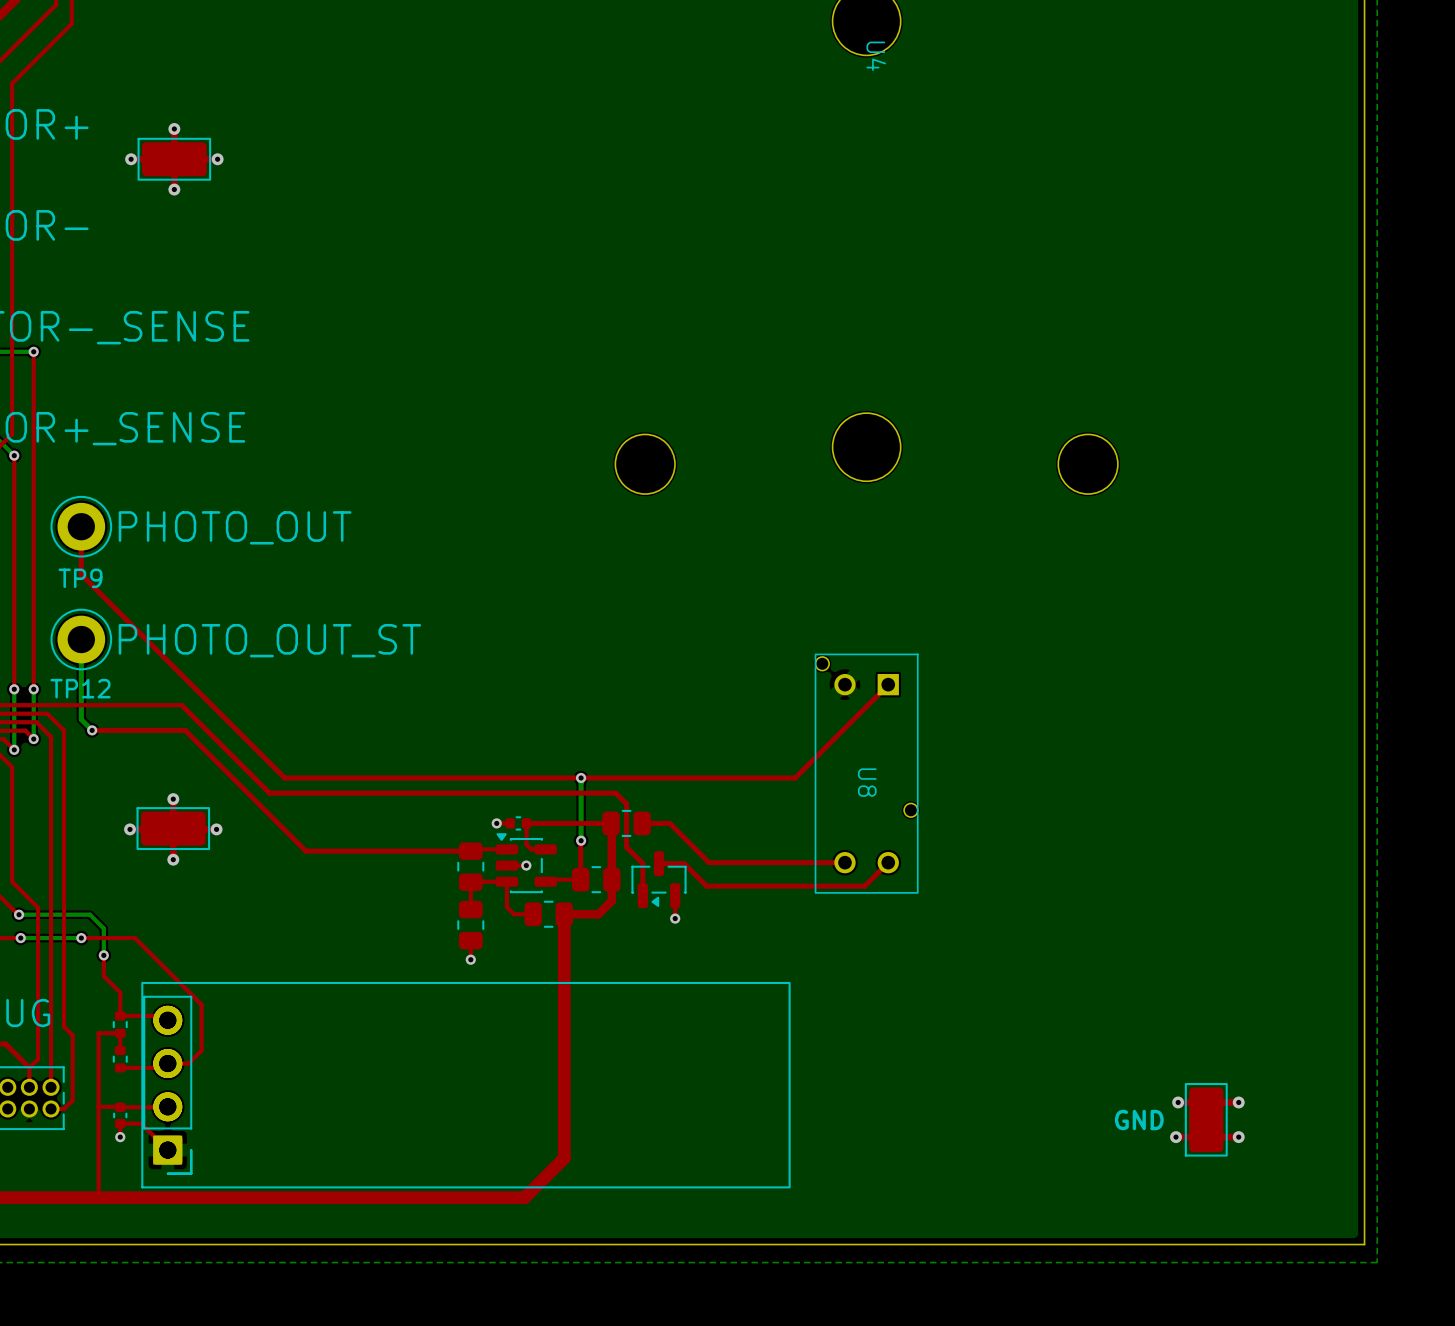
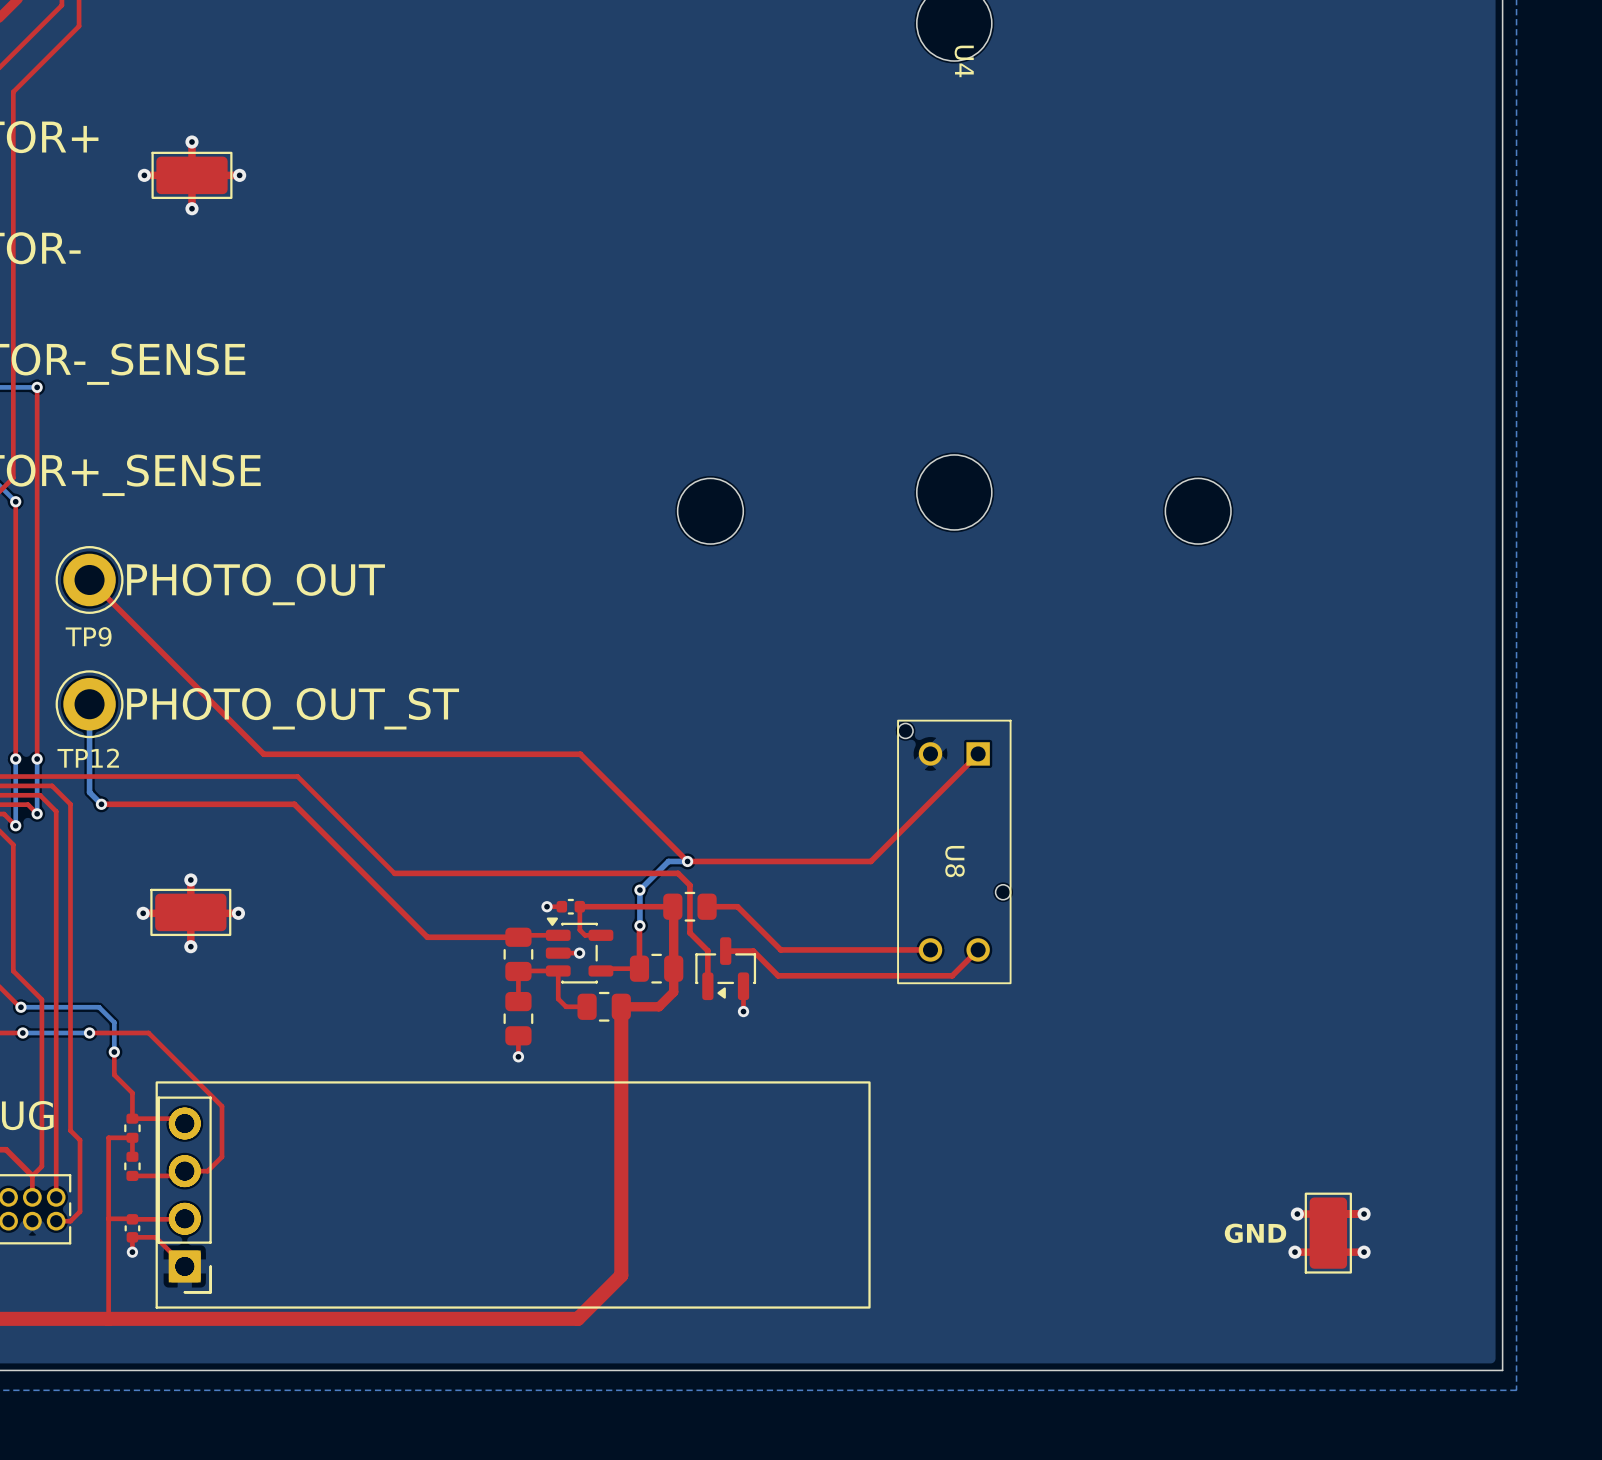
top track: (81, 526) (81, 574) (284, 777) (795, 777) -> (89, 579) (263, 754) (580, 754) (687, 861) (870, 861) (875, 856)
top track: (181, 705) (269, 793) (358, 793) -> (199, 776) (297, 776) (394, 873)
top track: (185, 730) (305, 851) (388, 851) -> (203, 804) (294, 804) (427, 937)
bottom track: (581, 777) (581, 808) -> (687, 861) (668, 861) (639, 890)
via: (581, 777) -> none
via: none -> (687, 861)
via: none -> (639, 890)

